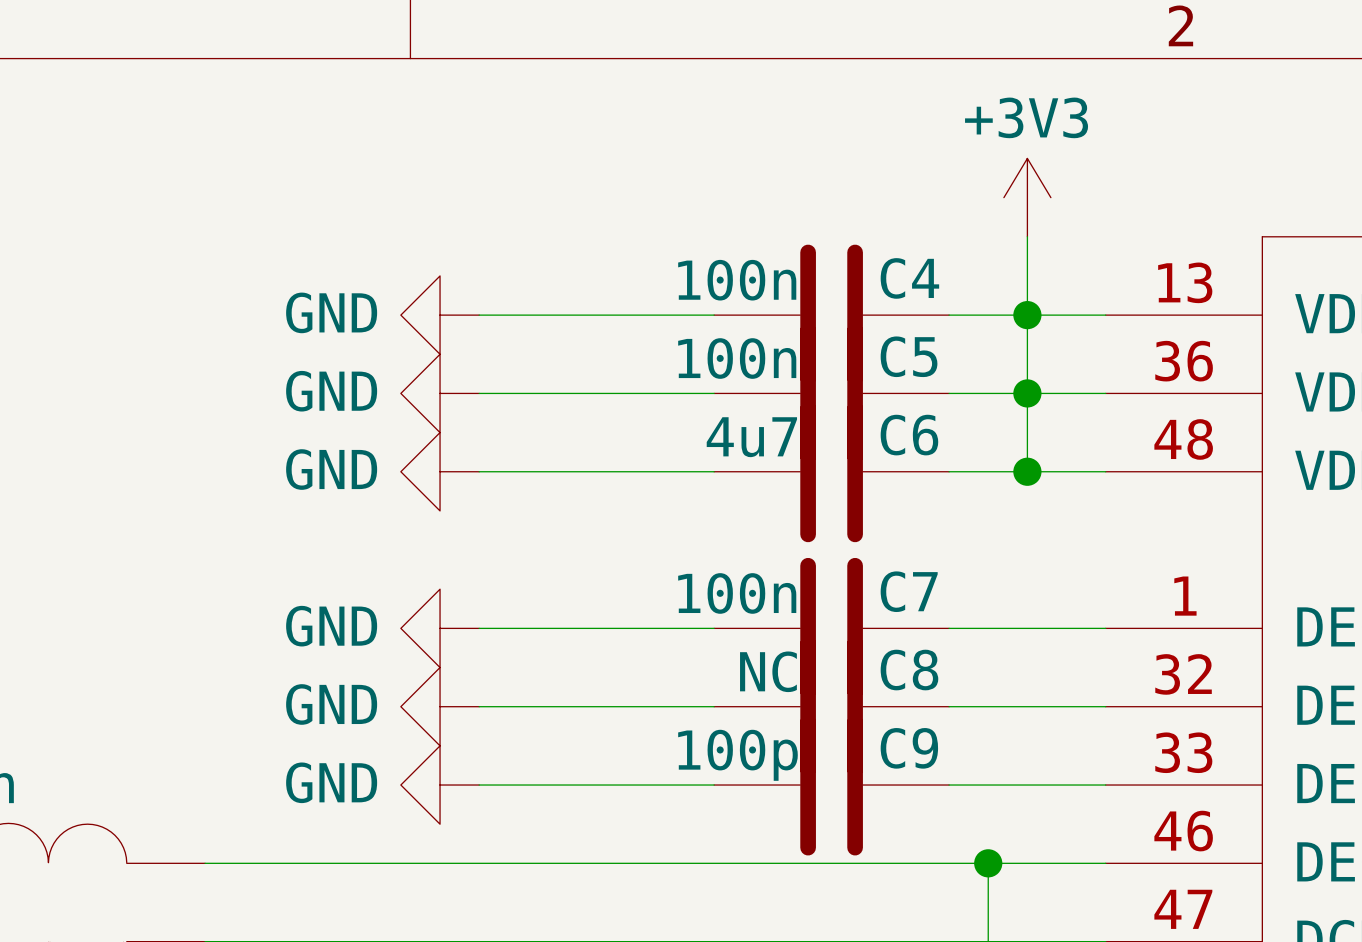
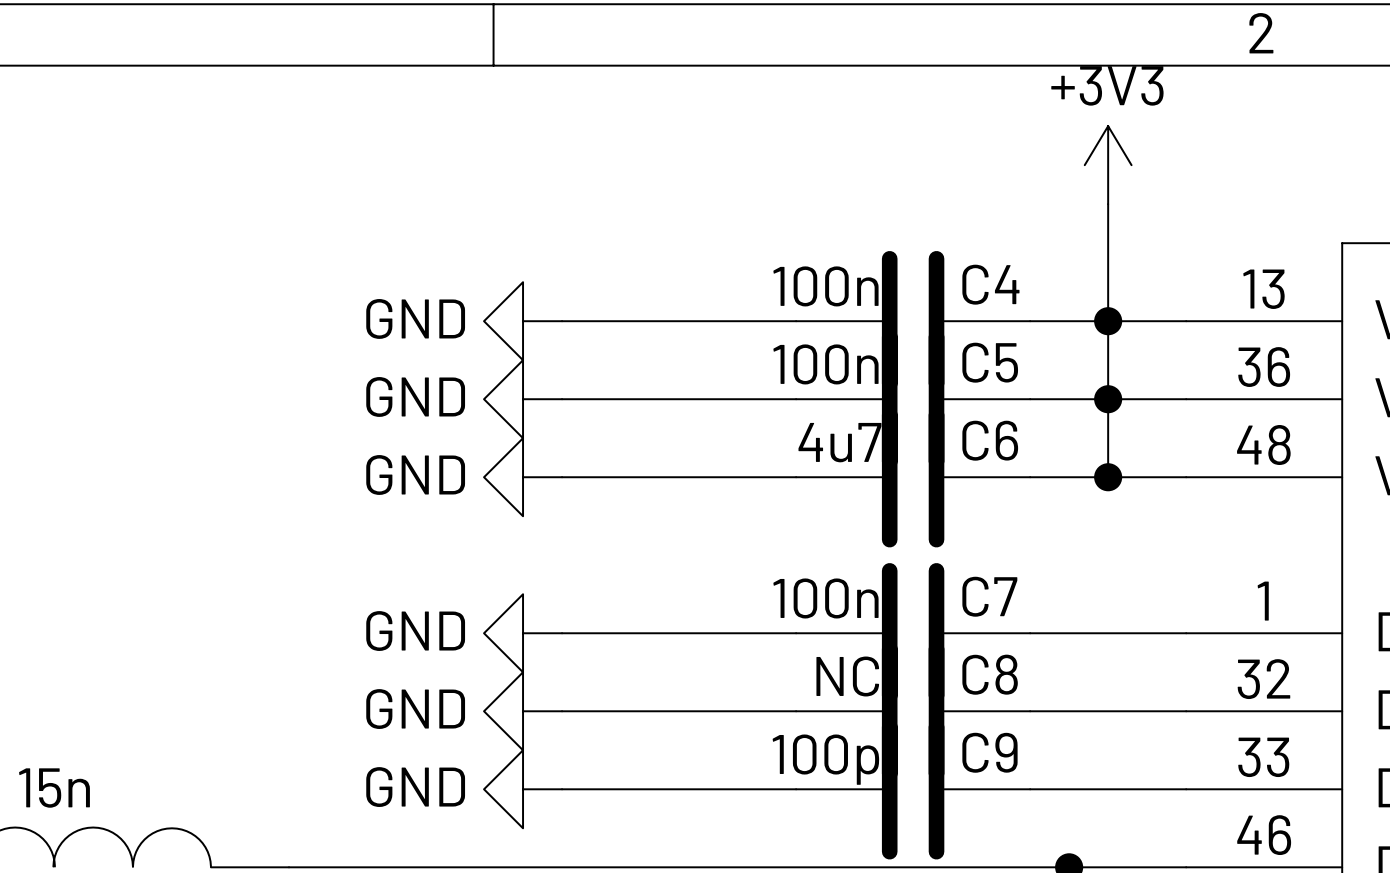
power symbol position: +3V3 (1027, 197) -> +3V3 (1108, 165)

